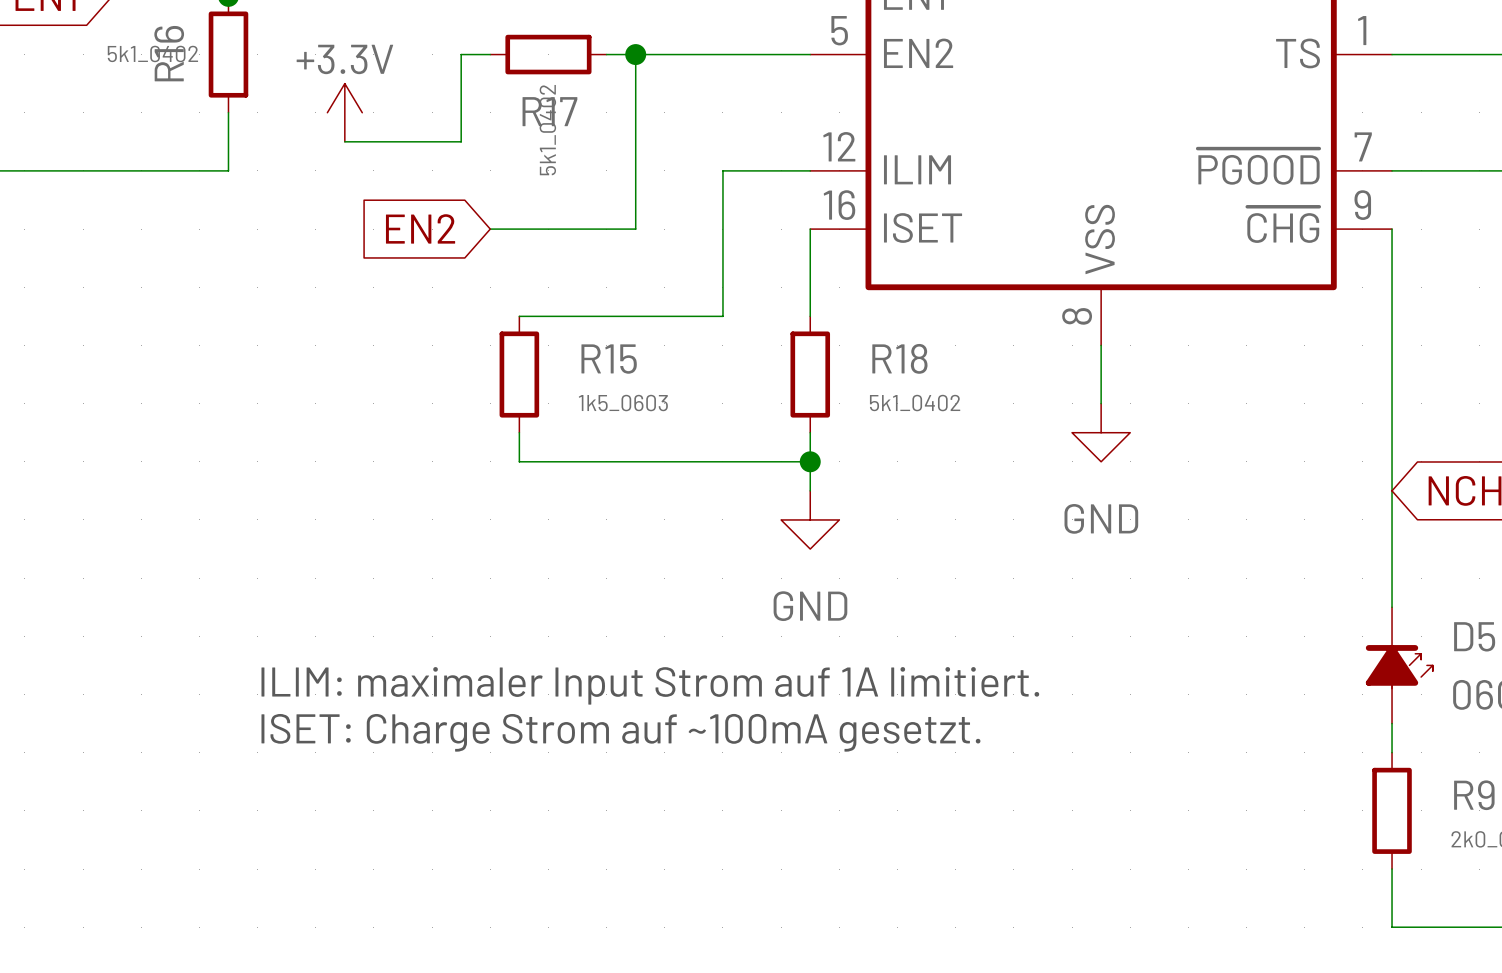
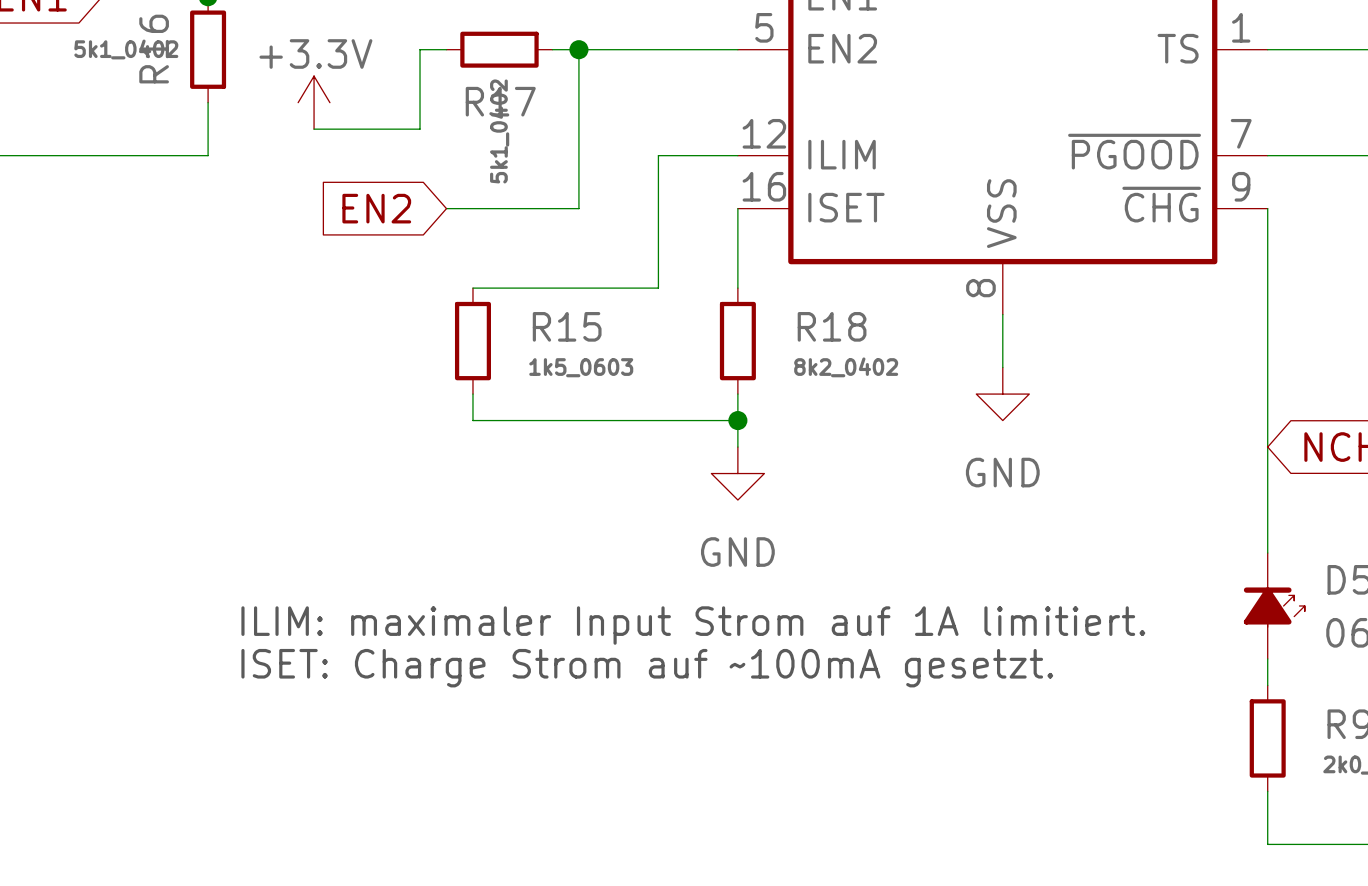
R18 value: 5k1_0402 (915, 403) -> 8k2_0402 (846, 367)

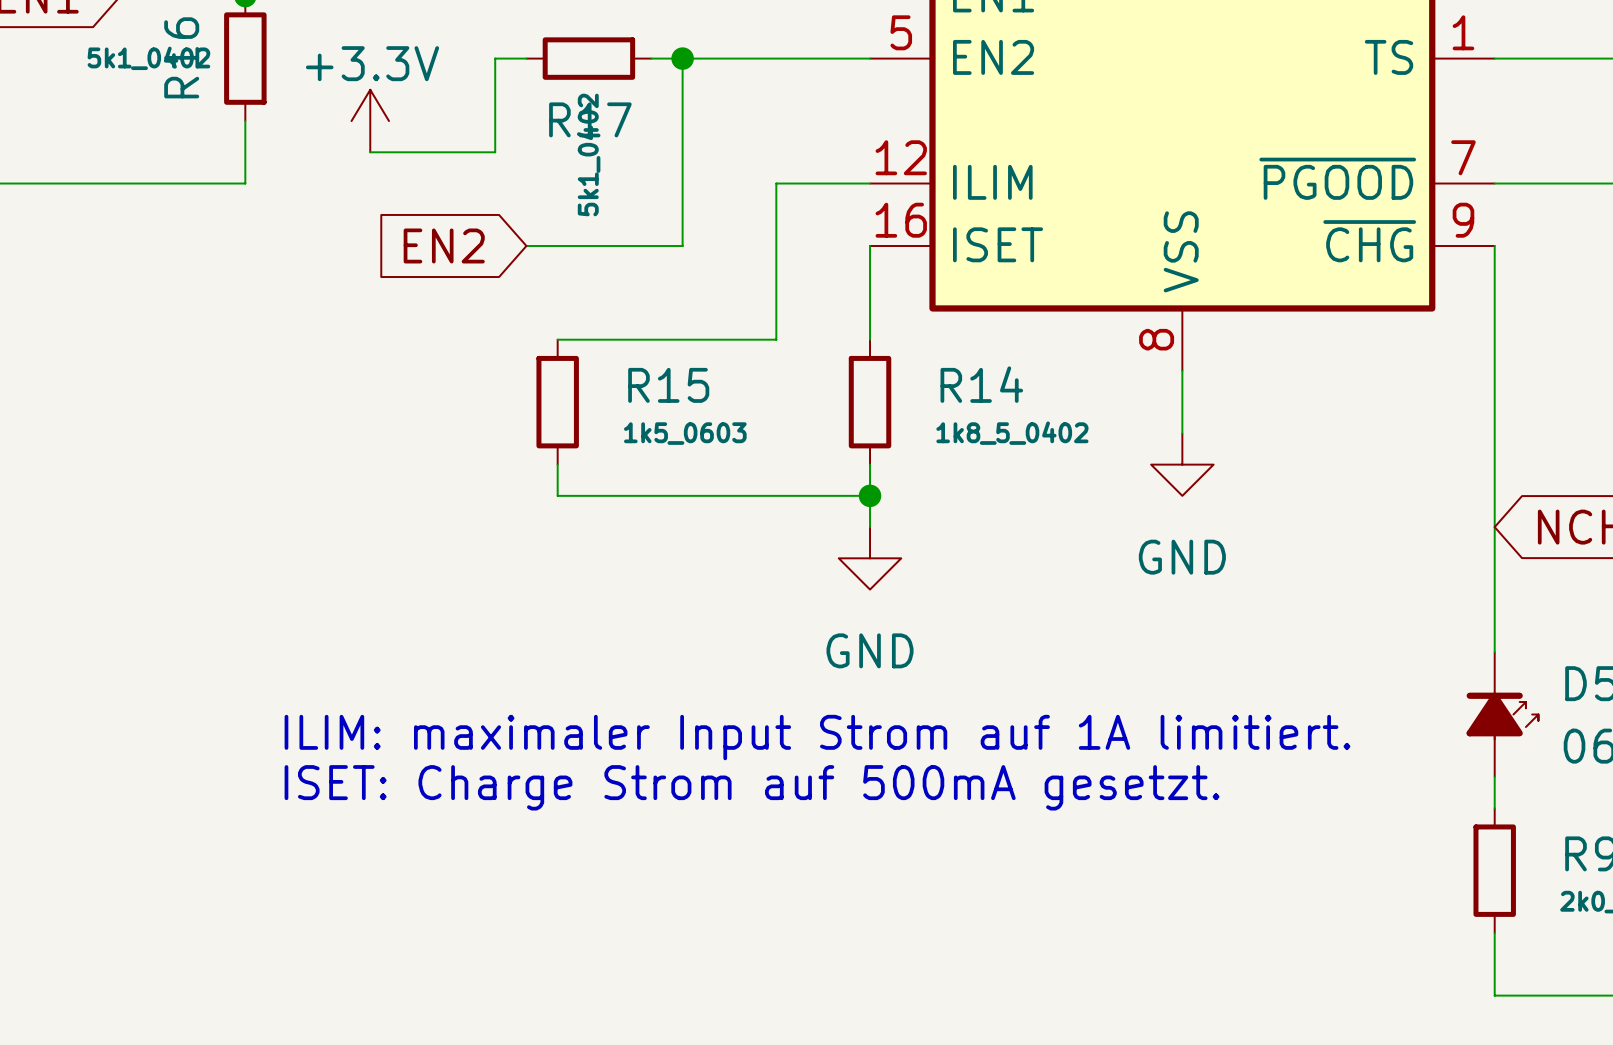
R18 name: R18 (832, 326) -> R14 (981, 384)
R18 value: 8k2_0402 (846, 367) -> 1k8_5_0402 (1012, 433)
text: ISET: Charge Strom auf ~100mA gesetzt. (647, 668) -> ISET: Charge Strom auf 500mA gesetzt. (752, 787)

